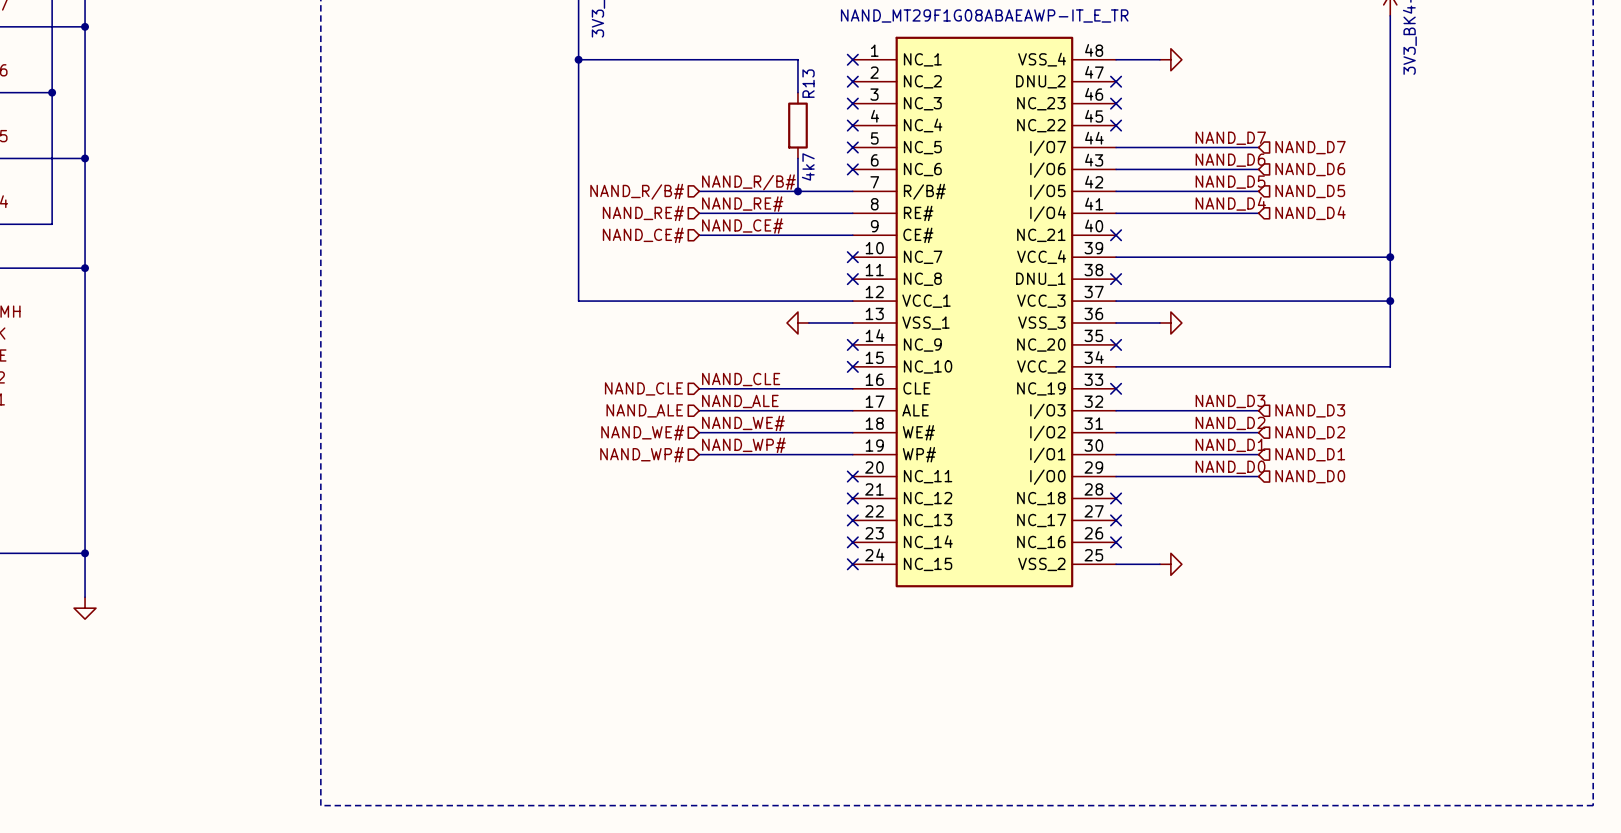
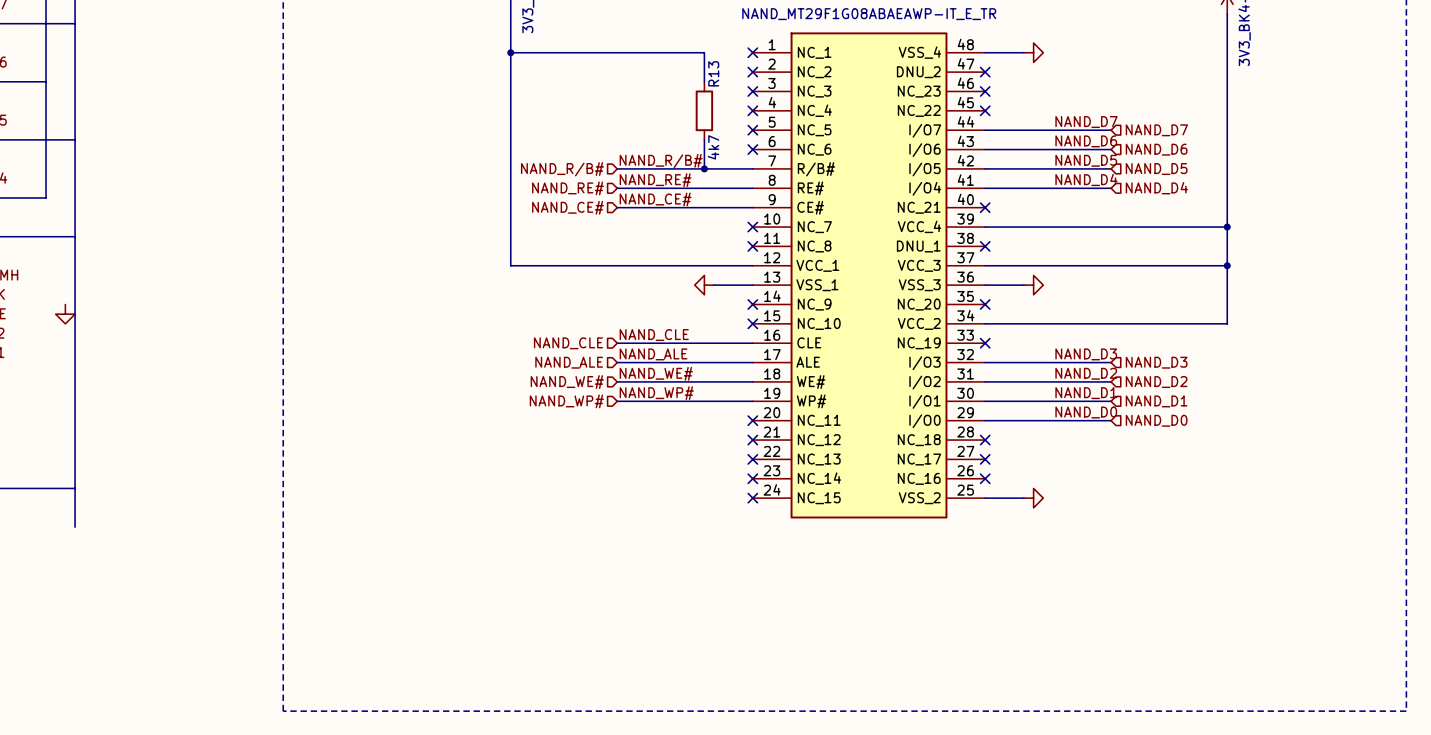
junction: (85, 26) -> none
junction: (52, 92) -> none
junction: (85, 158) -> none
junction: (85, 268) -> none
power symbol: none -> (65, 314)
junction: (85, 553) -> none
power symbol: (85, 608) -> none

